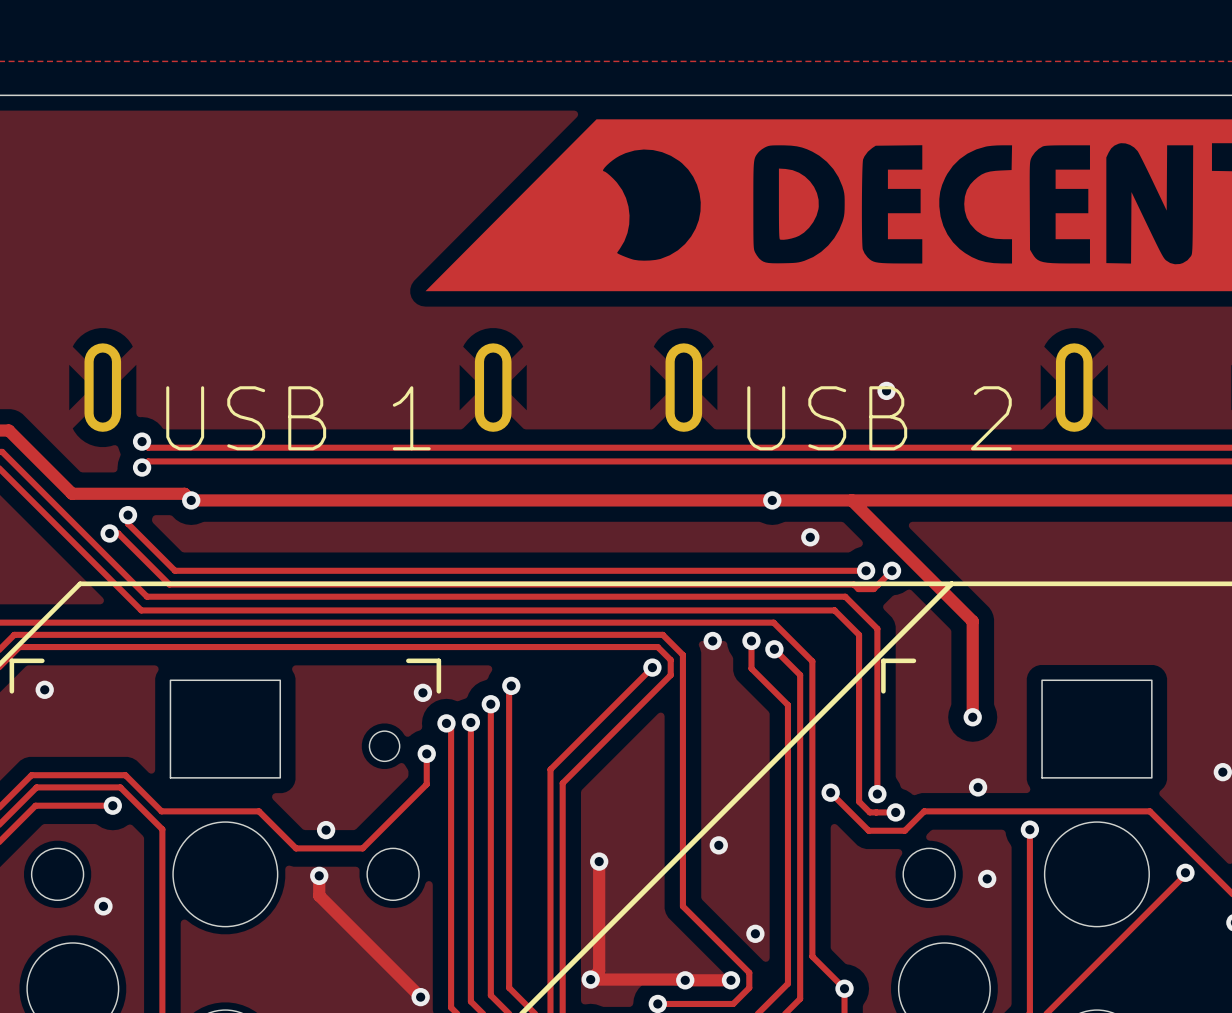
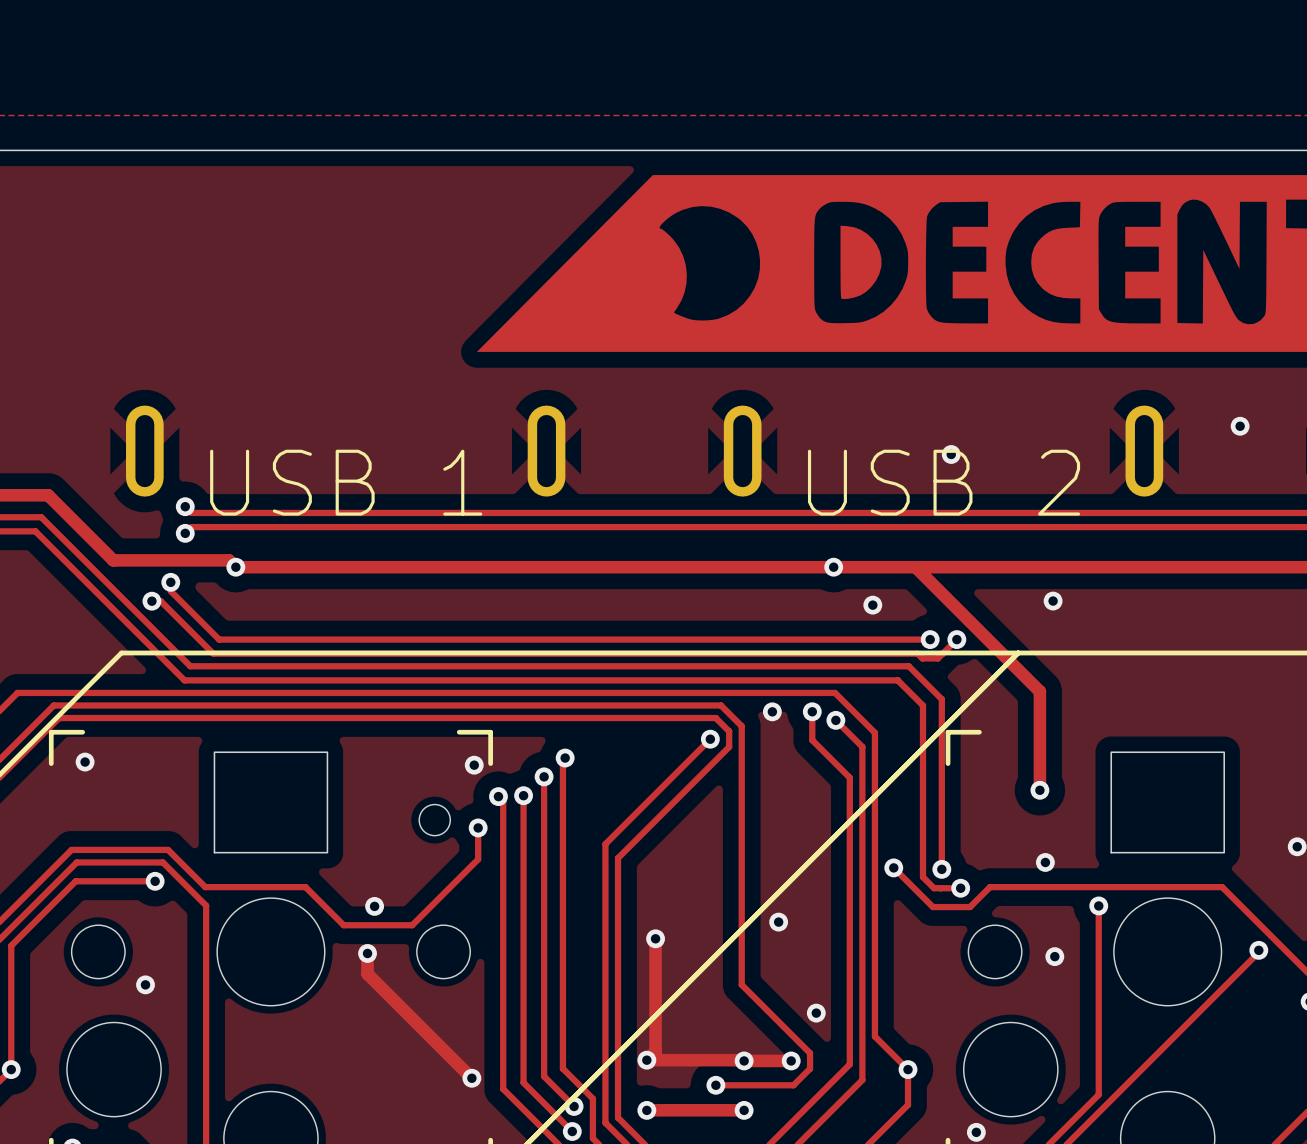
via: none -> (1240, 426)
via: none -> (1053, 601)

